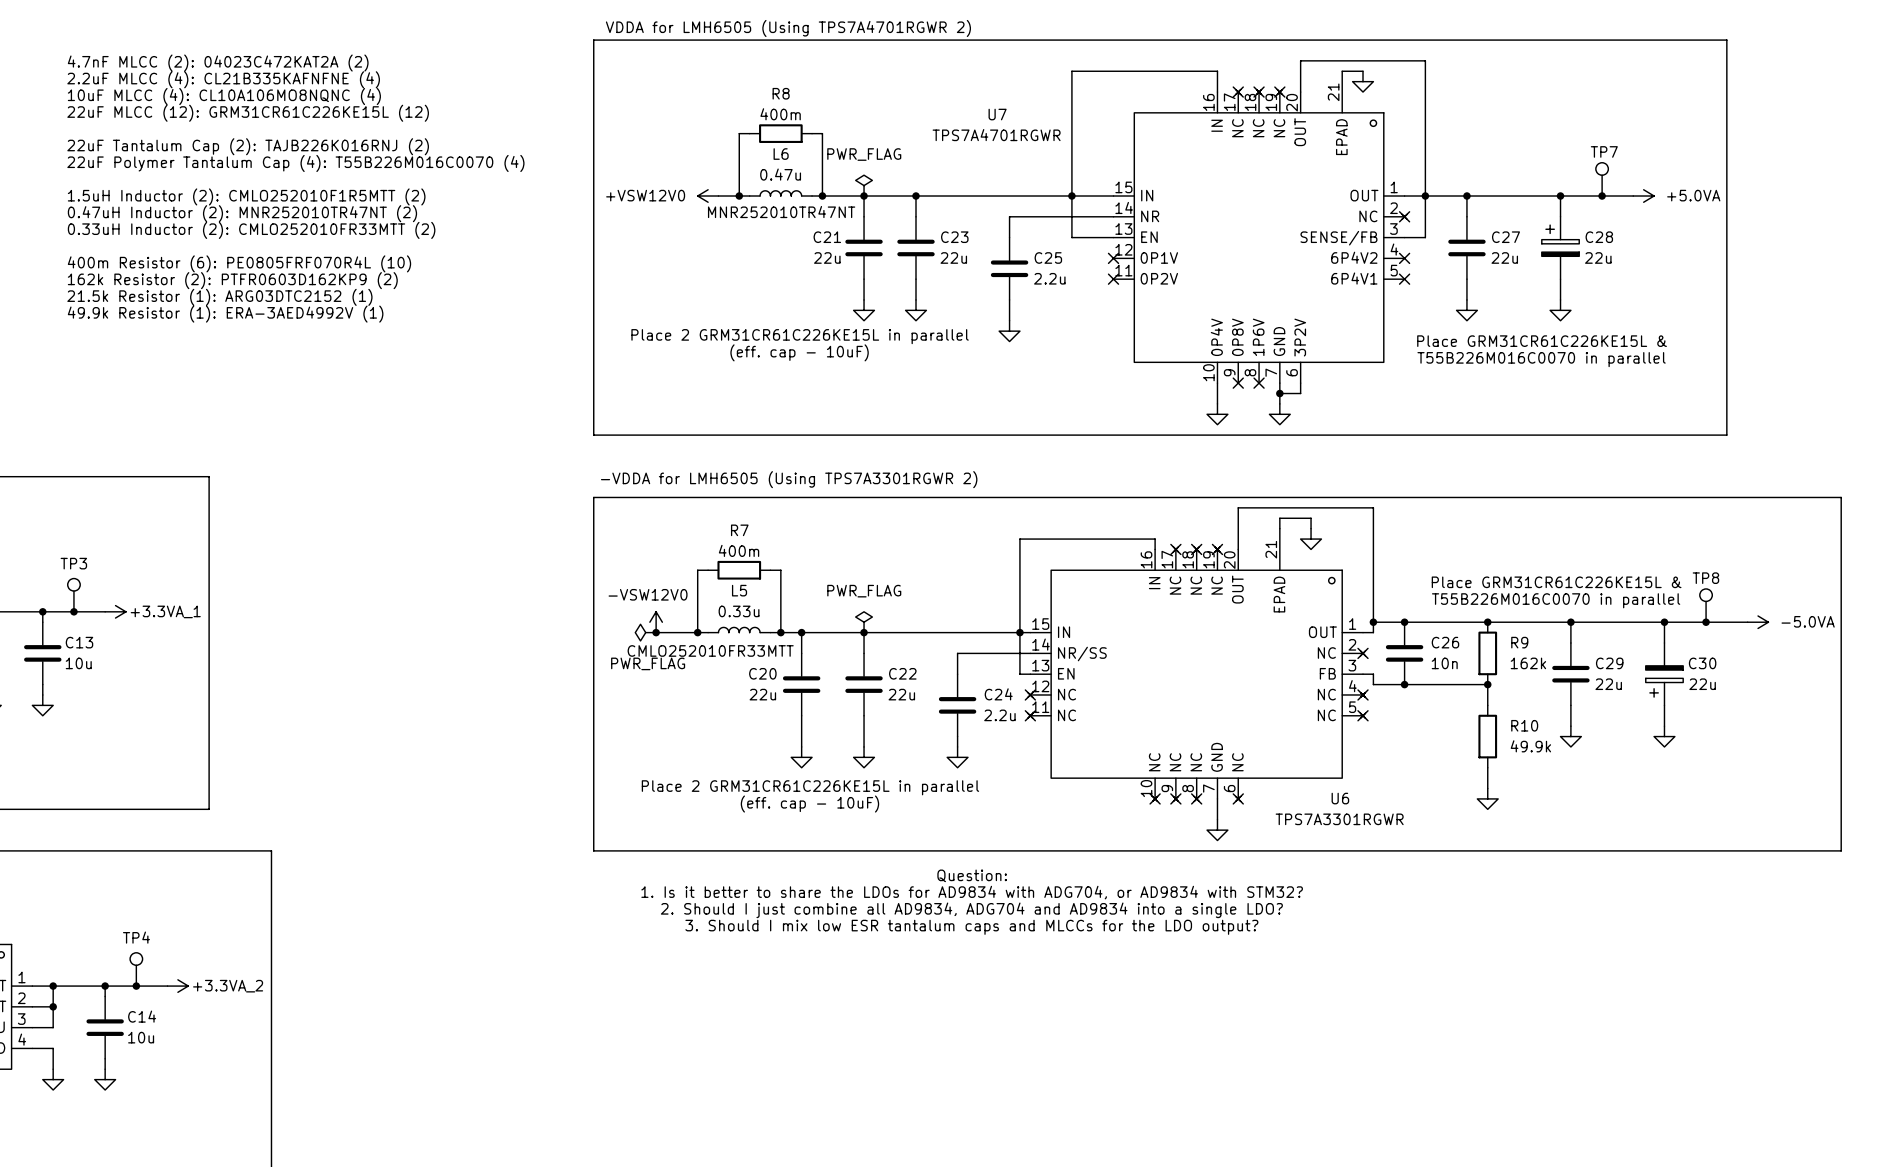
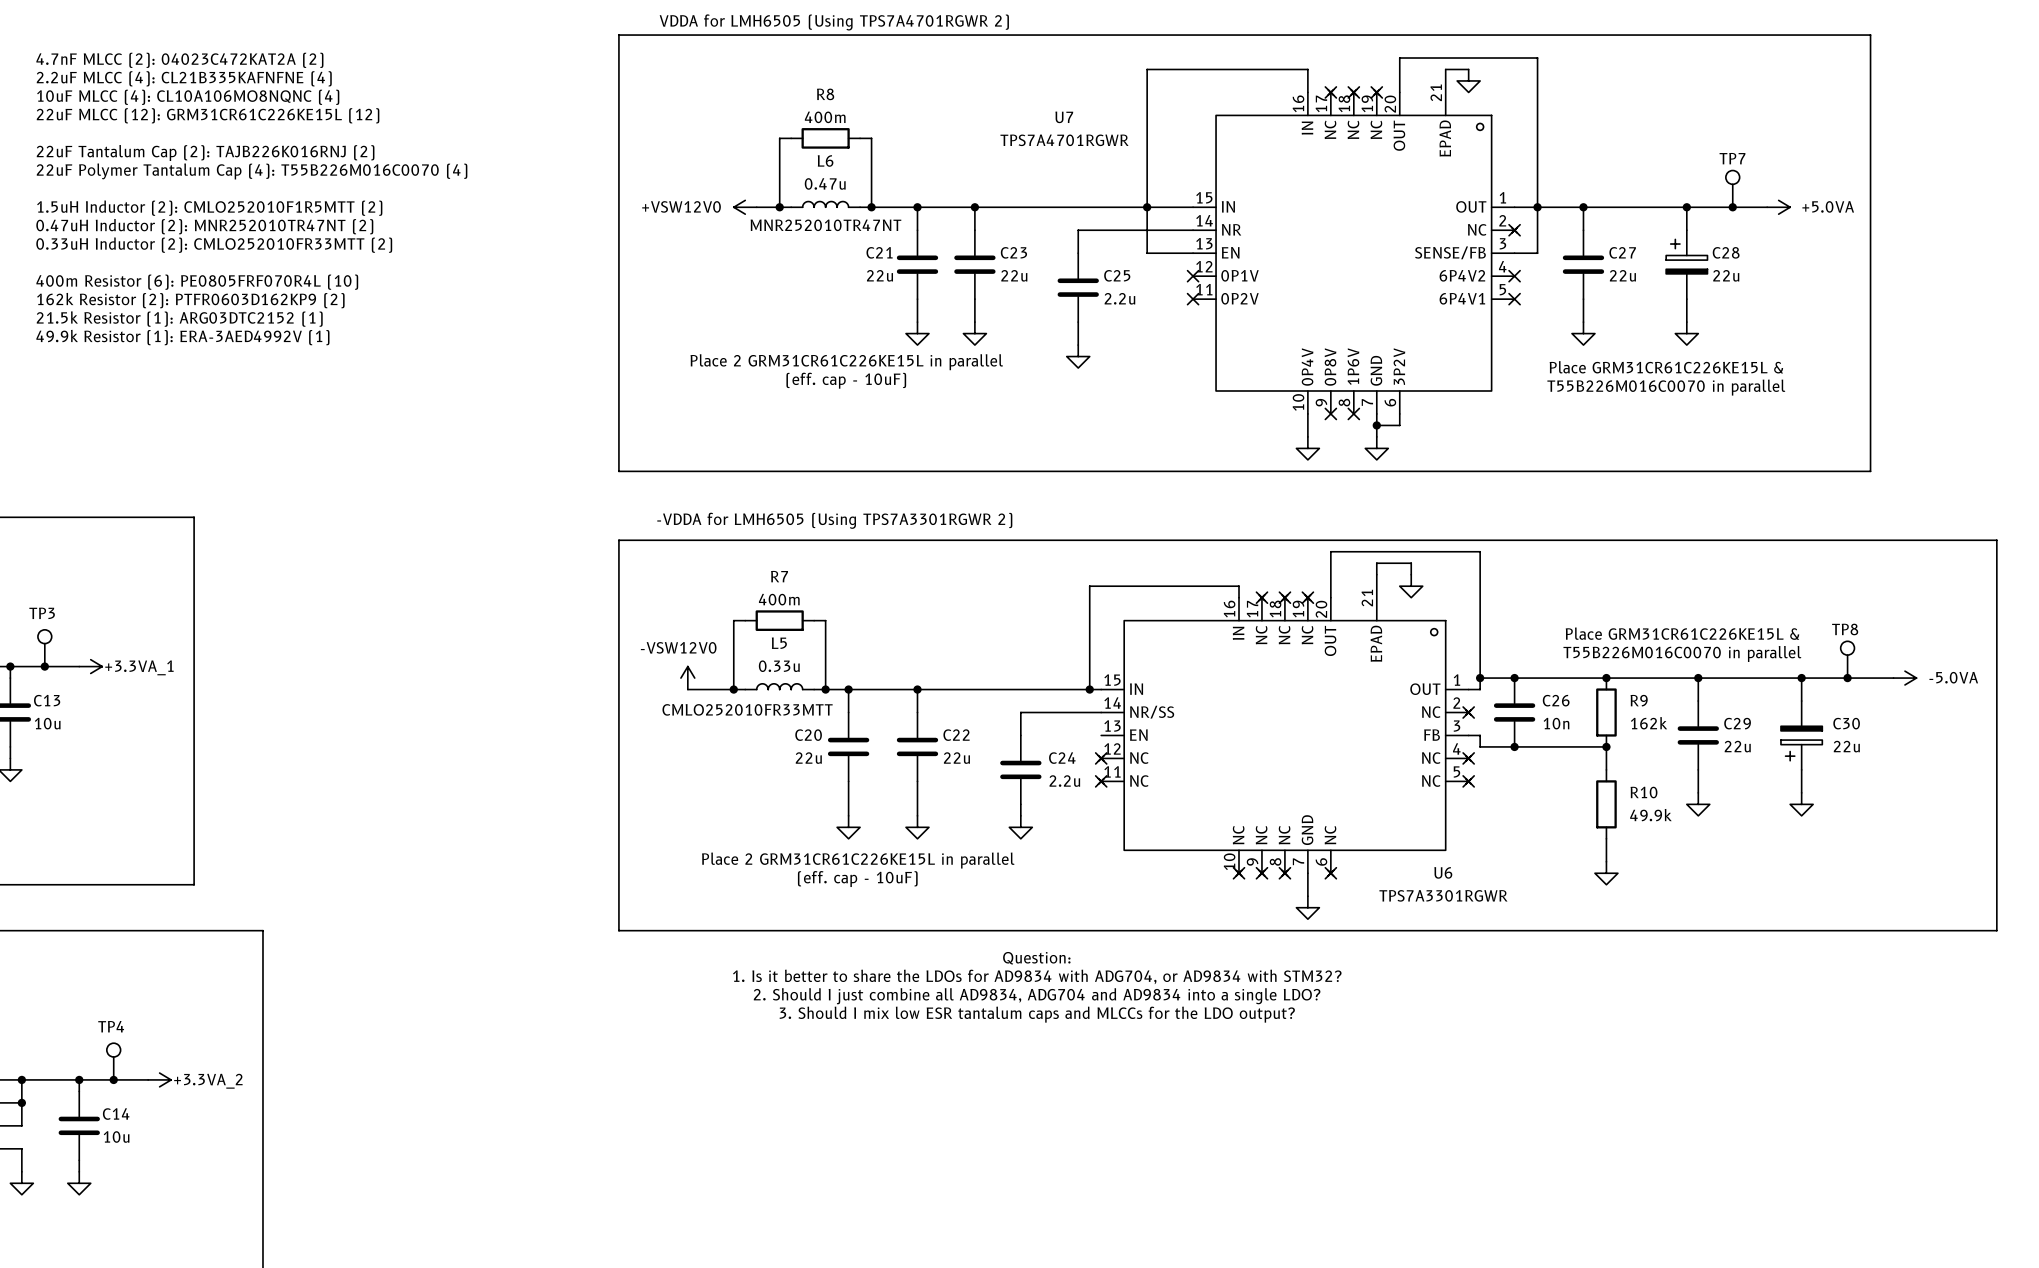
power symbol: PWR_FLAG (864, 185) -> none
power symbol: PWR_FLAG (864, 622) -> none
power symbol: PWR_FLAG (645, 632) -> none
junction: (656, 632) -> none
wire: (1019, 632) (1019, 674) (1030, 674) -> none

